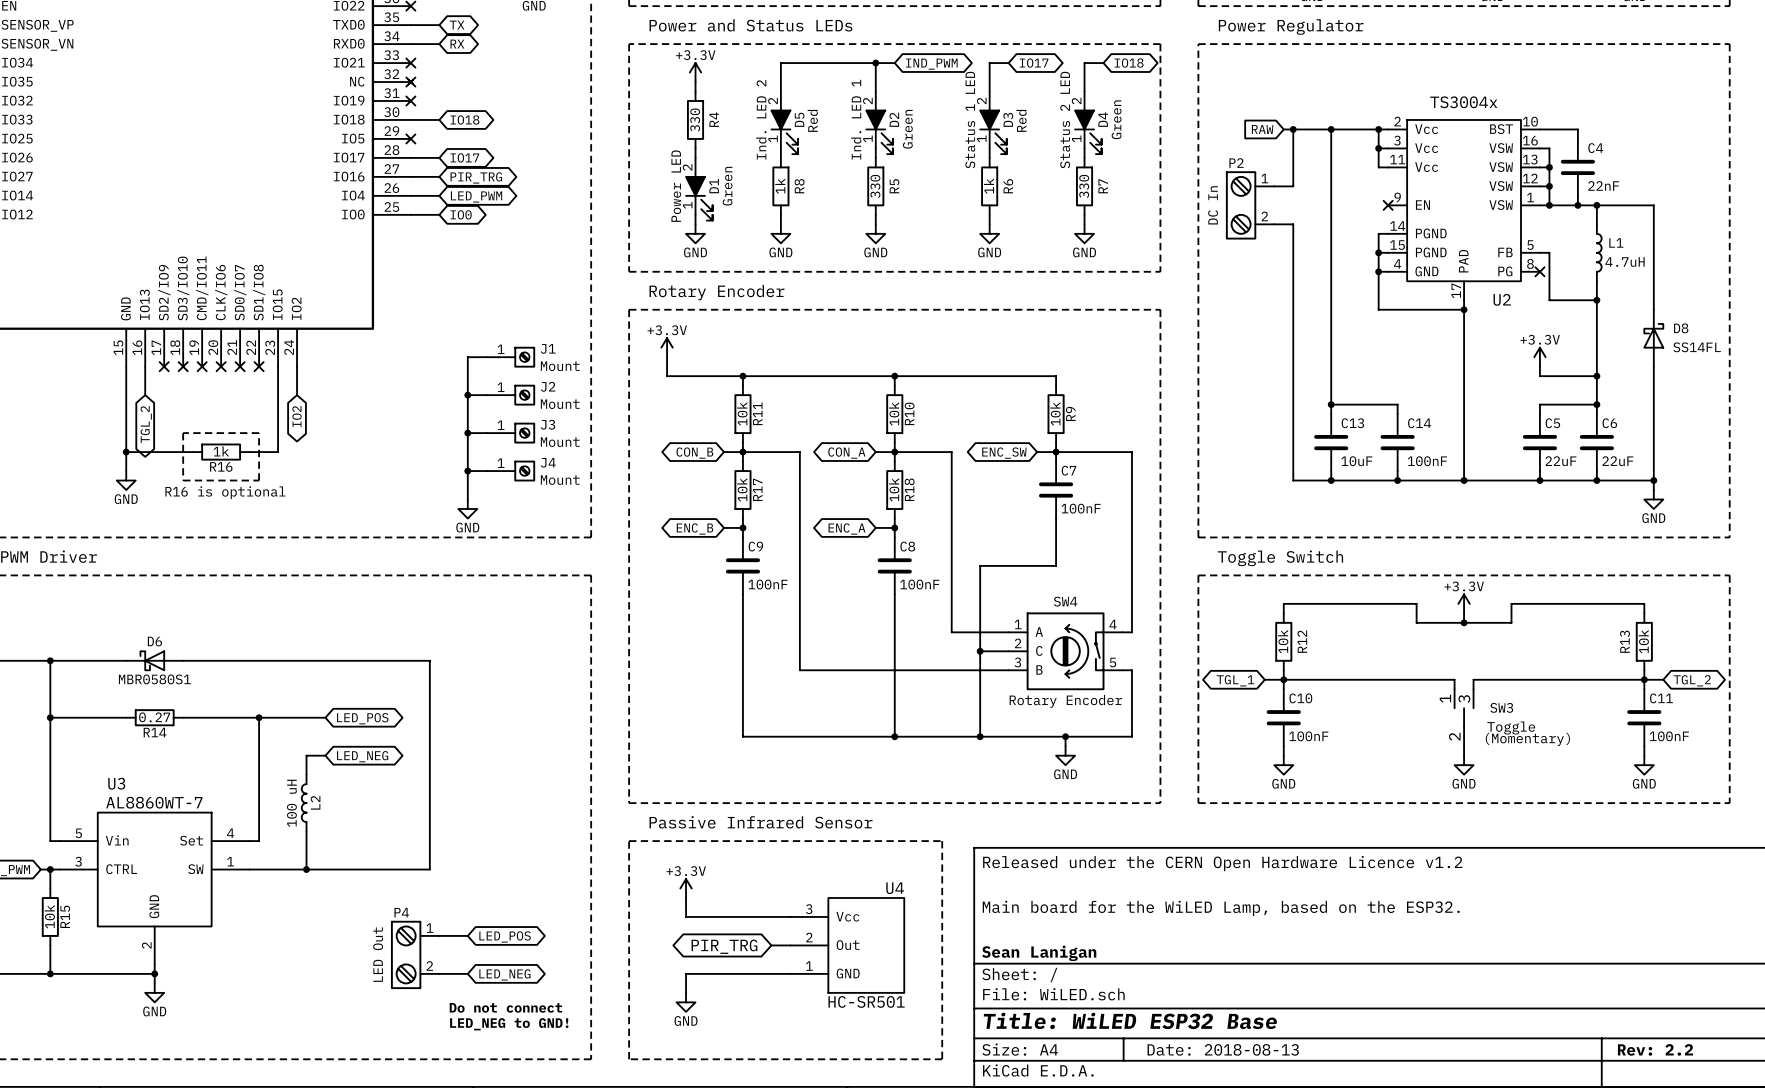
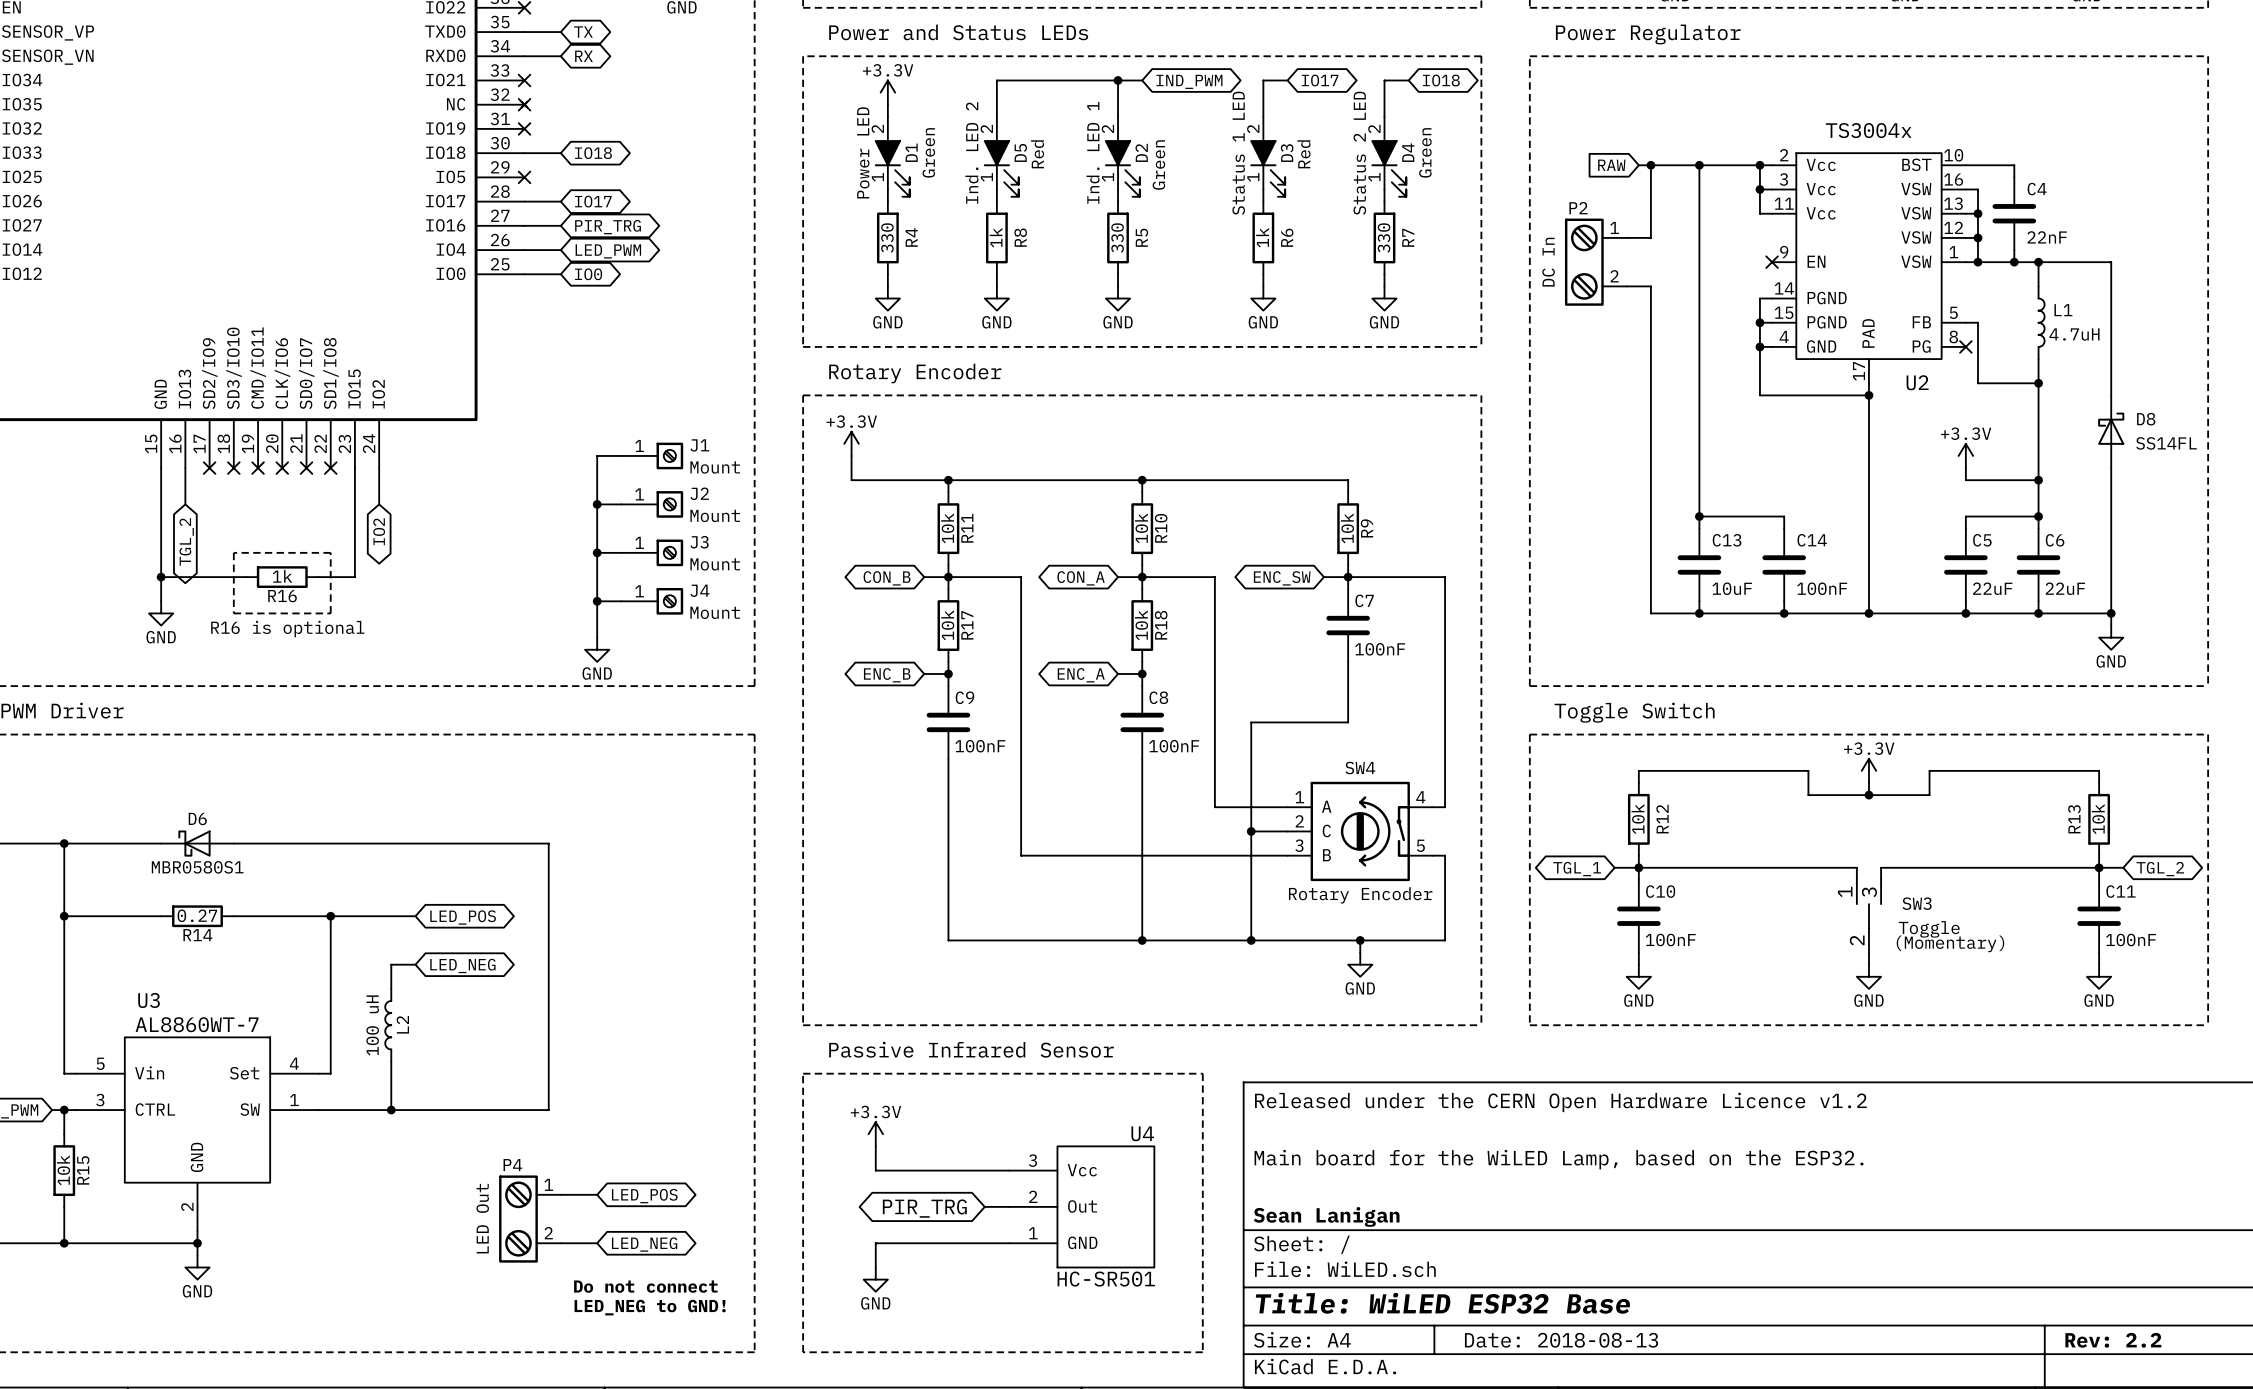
R4 position: (695, 119) -> (887, 237)
text position: Green (727, 186) -> Green (928, 152)
D1 position: (698, 189) -> (892, 156)

